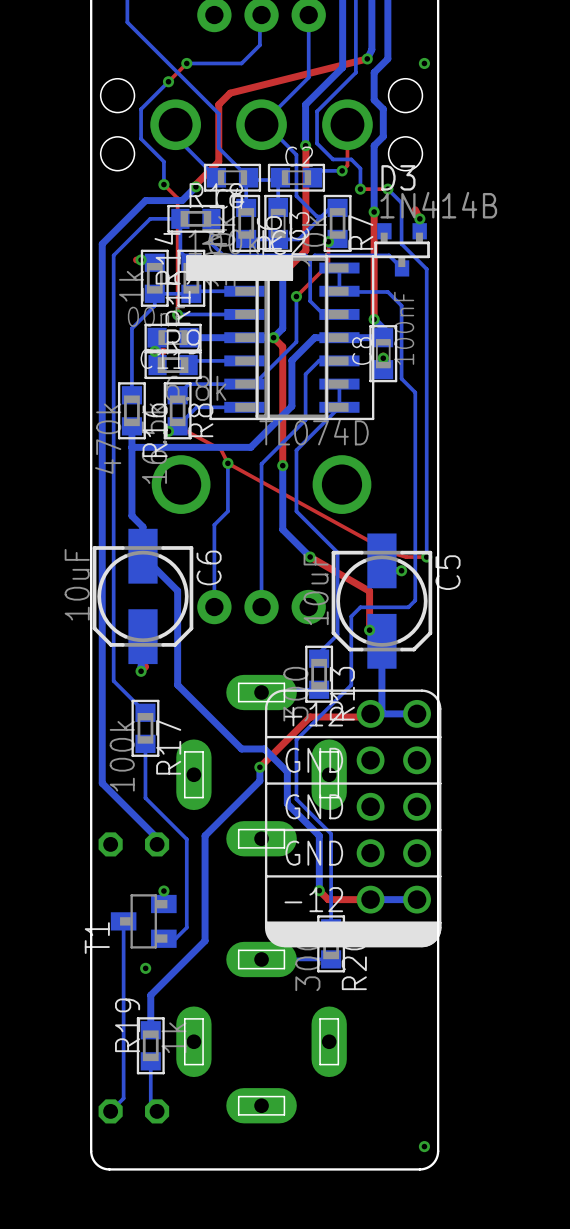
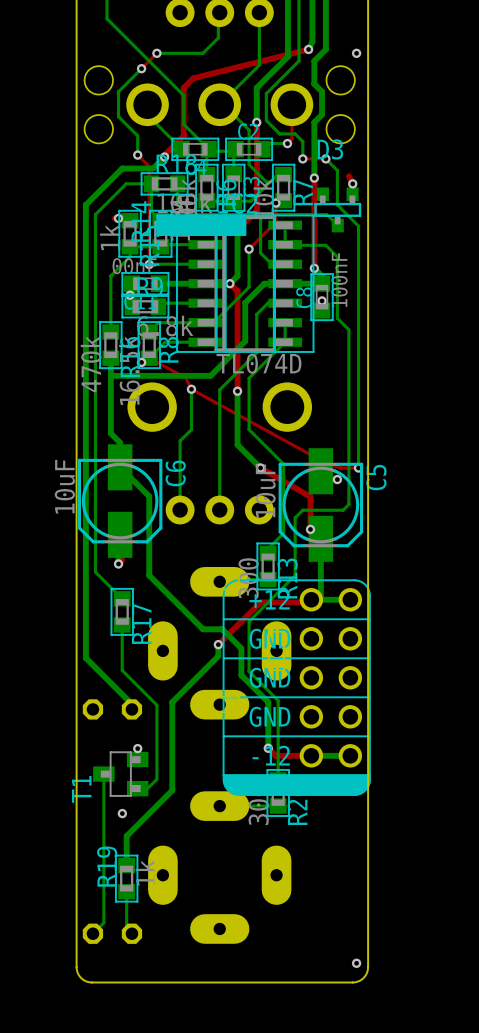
D3 value: 1N414B (438, 205) -> none
R17 value: 100k (122, 756) -> none

